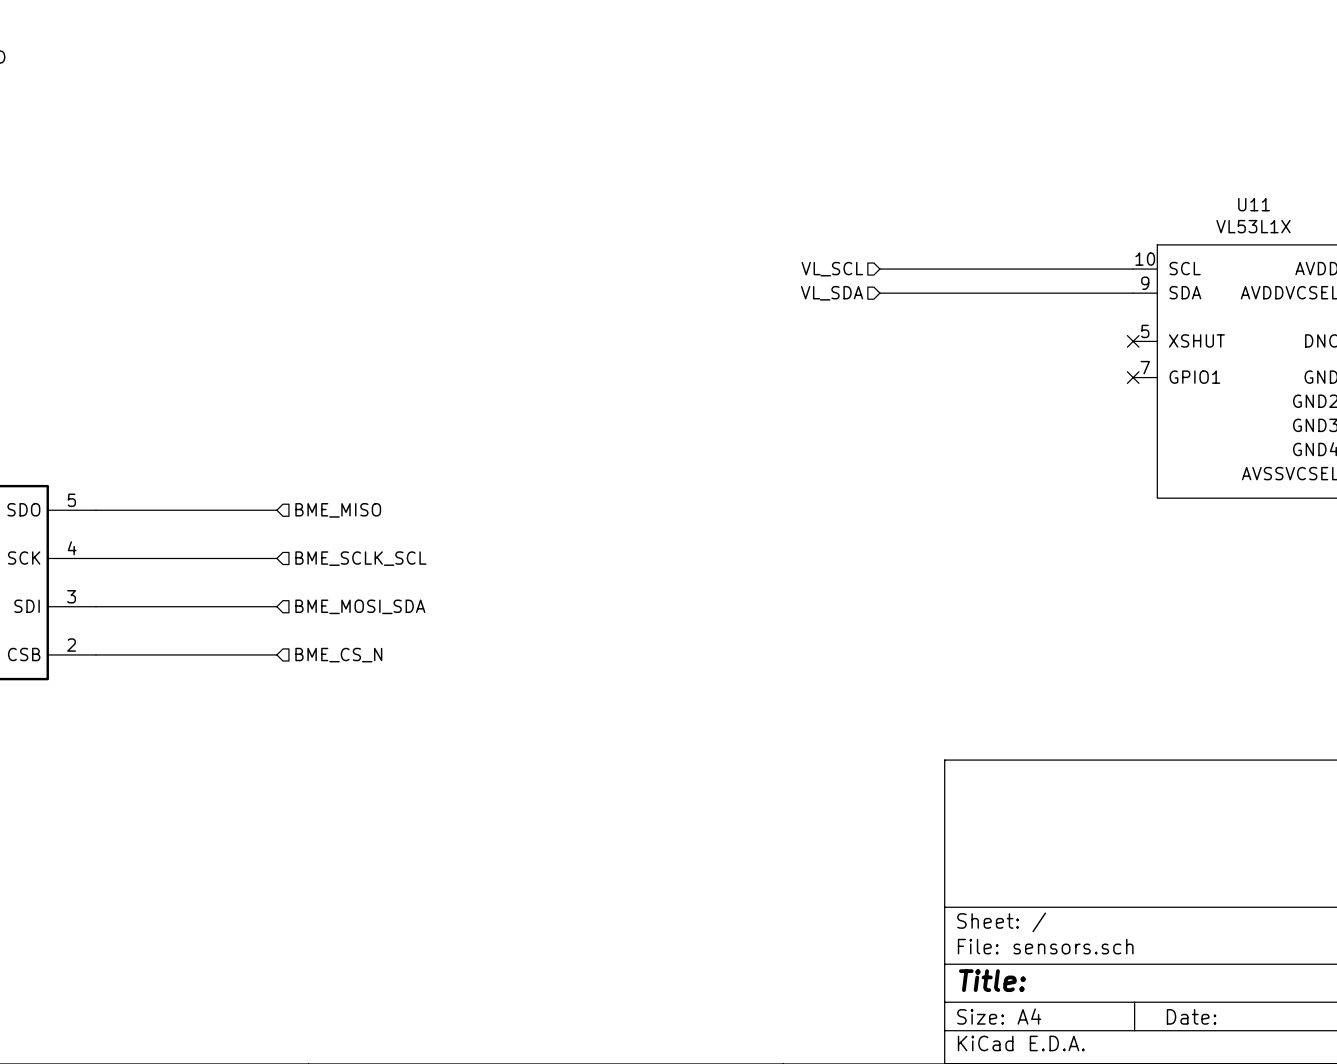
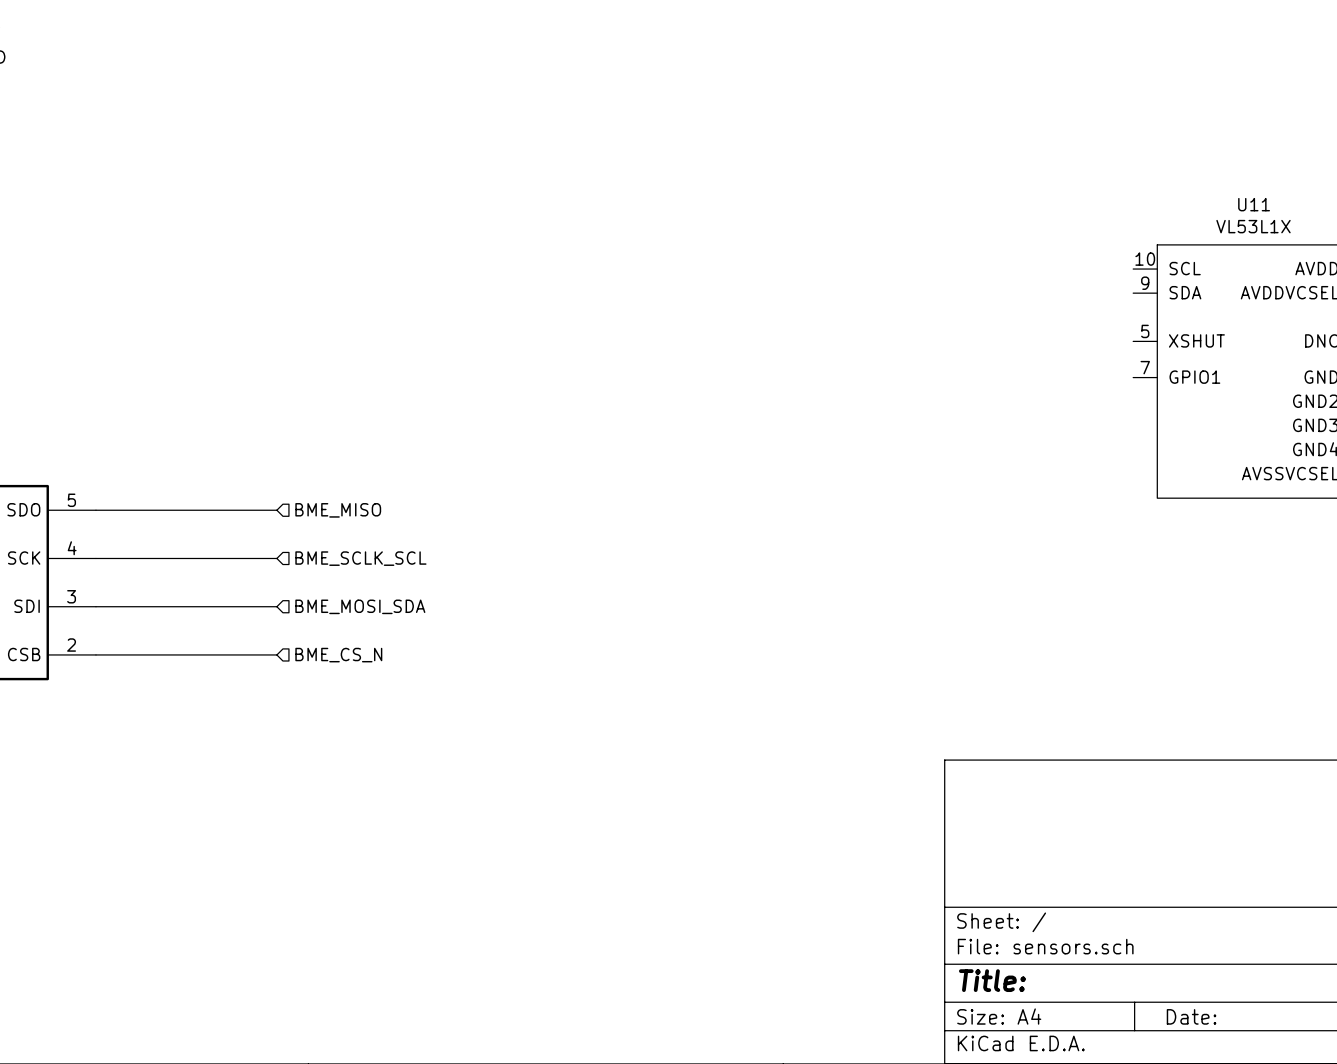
hierarchical label: VL_SCL (832, 269) -> none
wire: (879, 269) (1133, 269) -> none
hierarchical label: VL_SDA (832, 293) -> none
wire: (879, 293) (1133, 293) -> none
no-connect mark: (1133, 341) -> none
no-connect mark: (1133, 377) -> none

